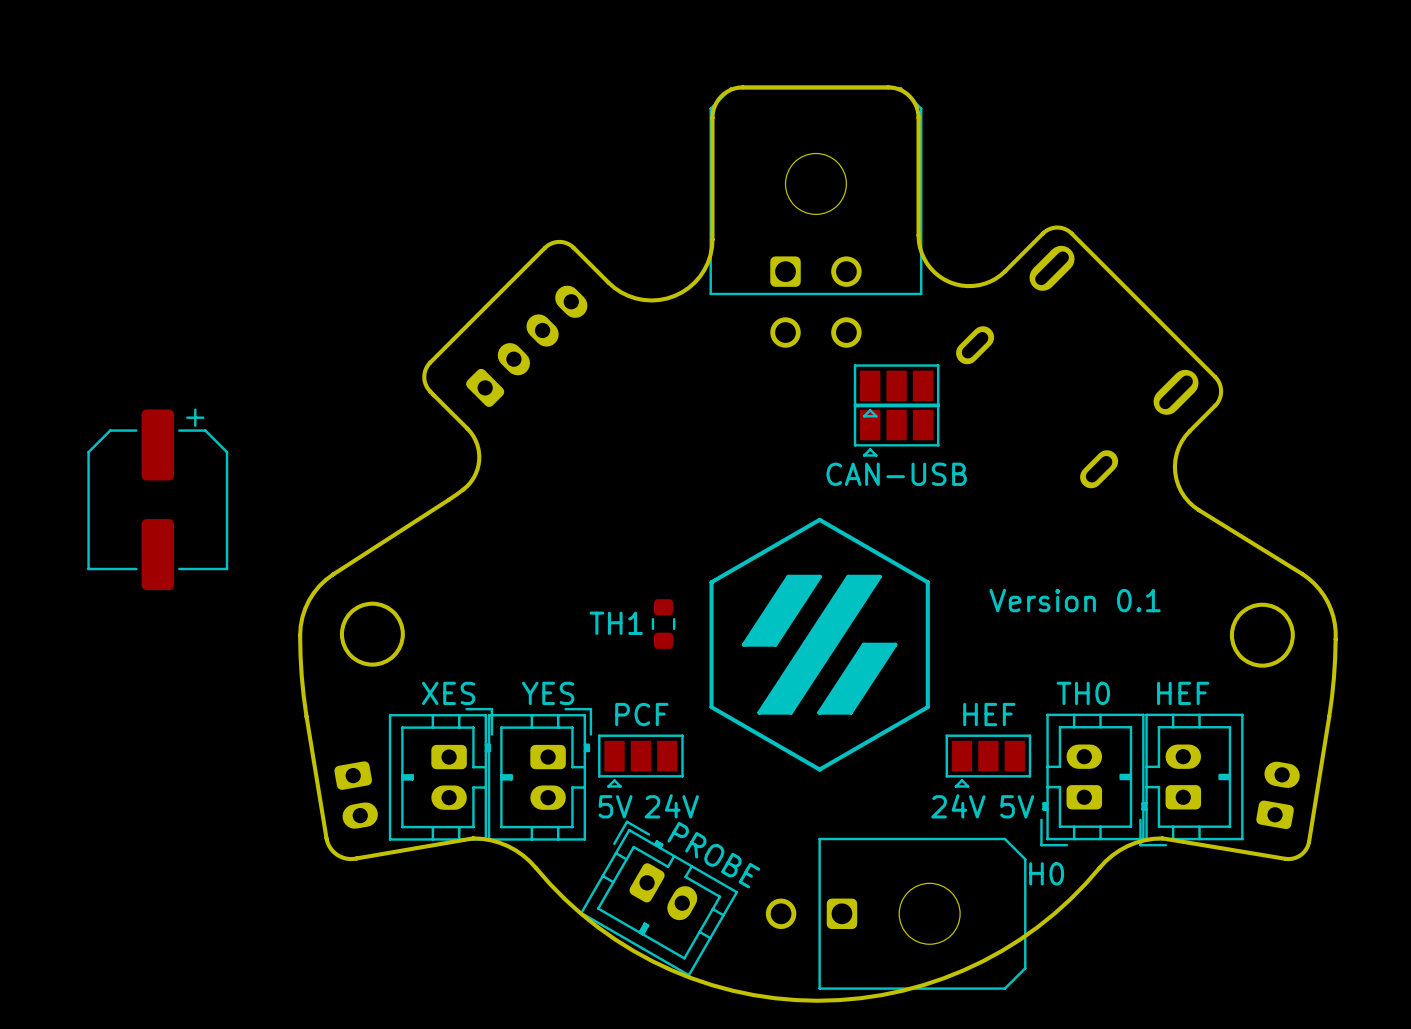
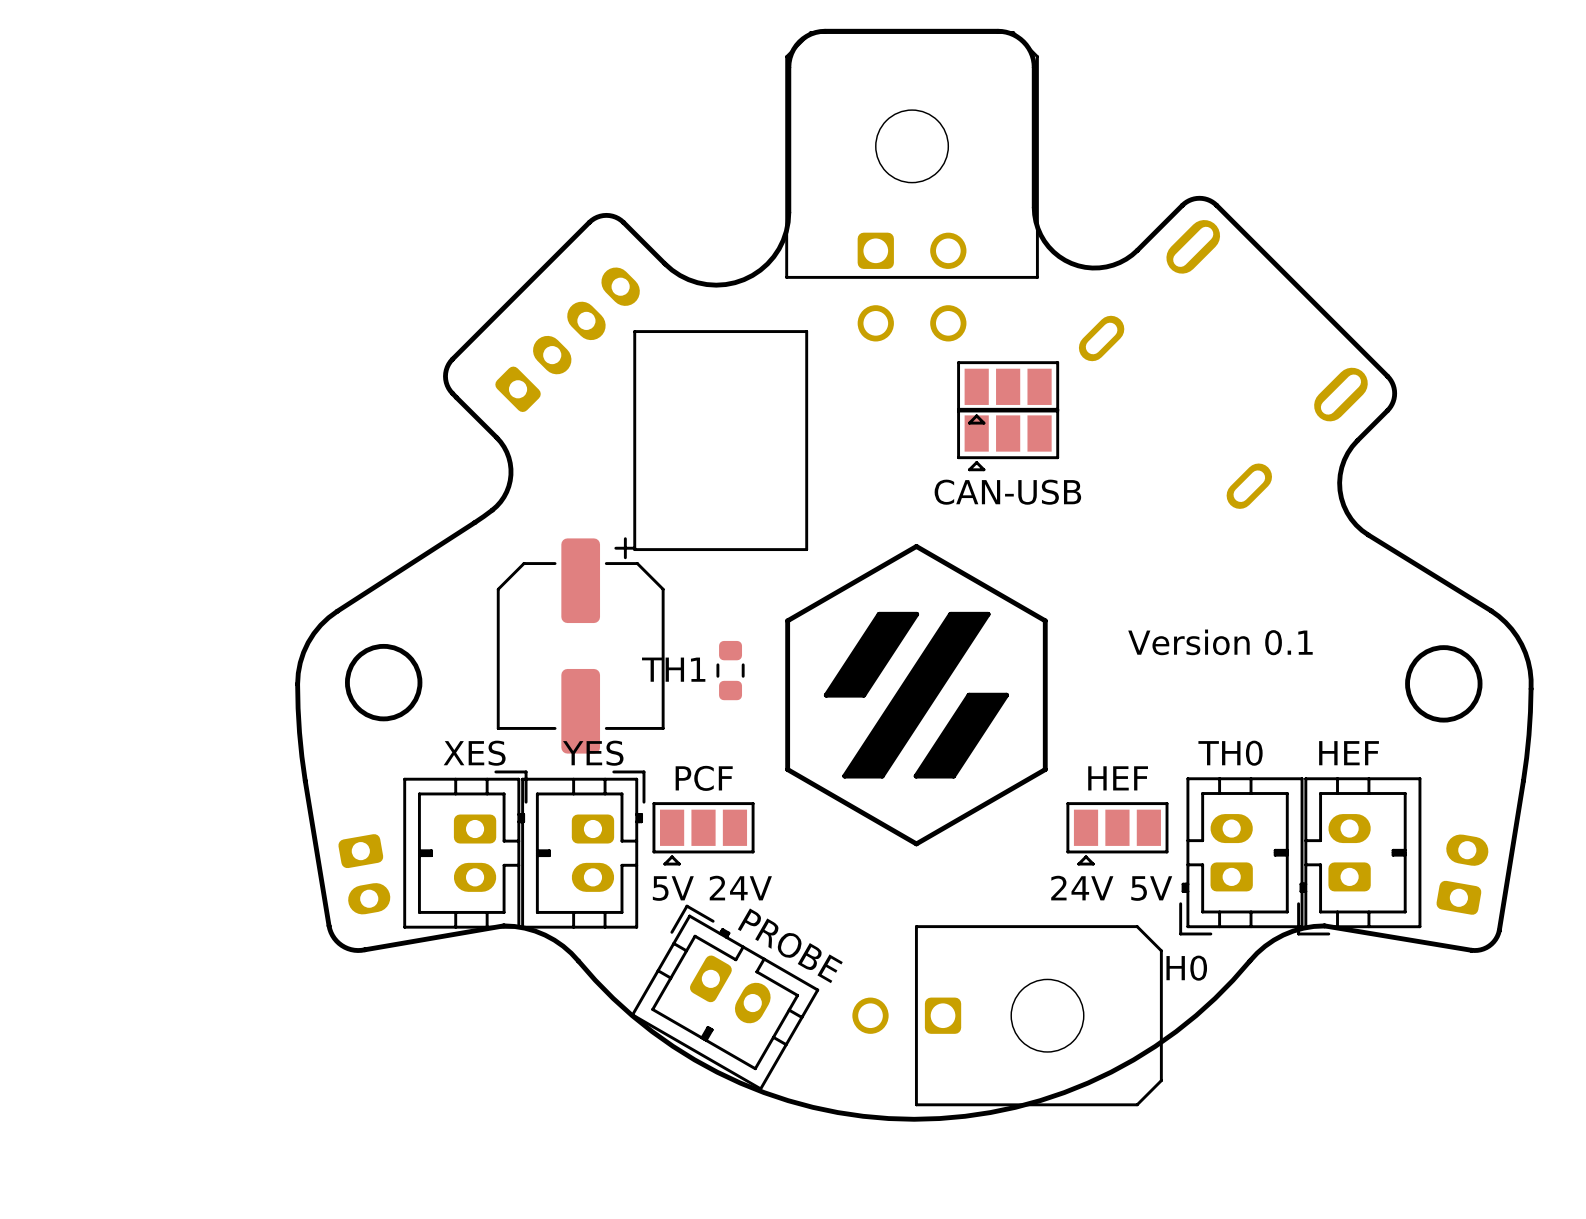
line: none -> (634, 331) (634, 549) (806, 549) (806, 331) (634, 331)
part position: (157, 499) -> (580, 645)

